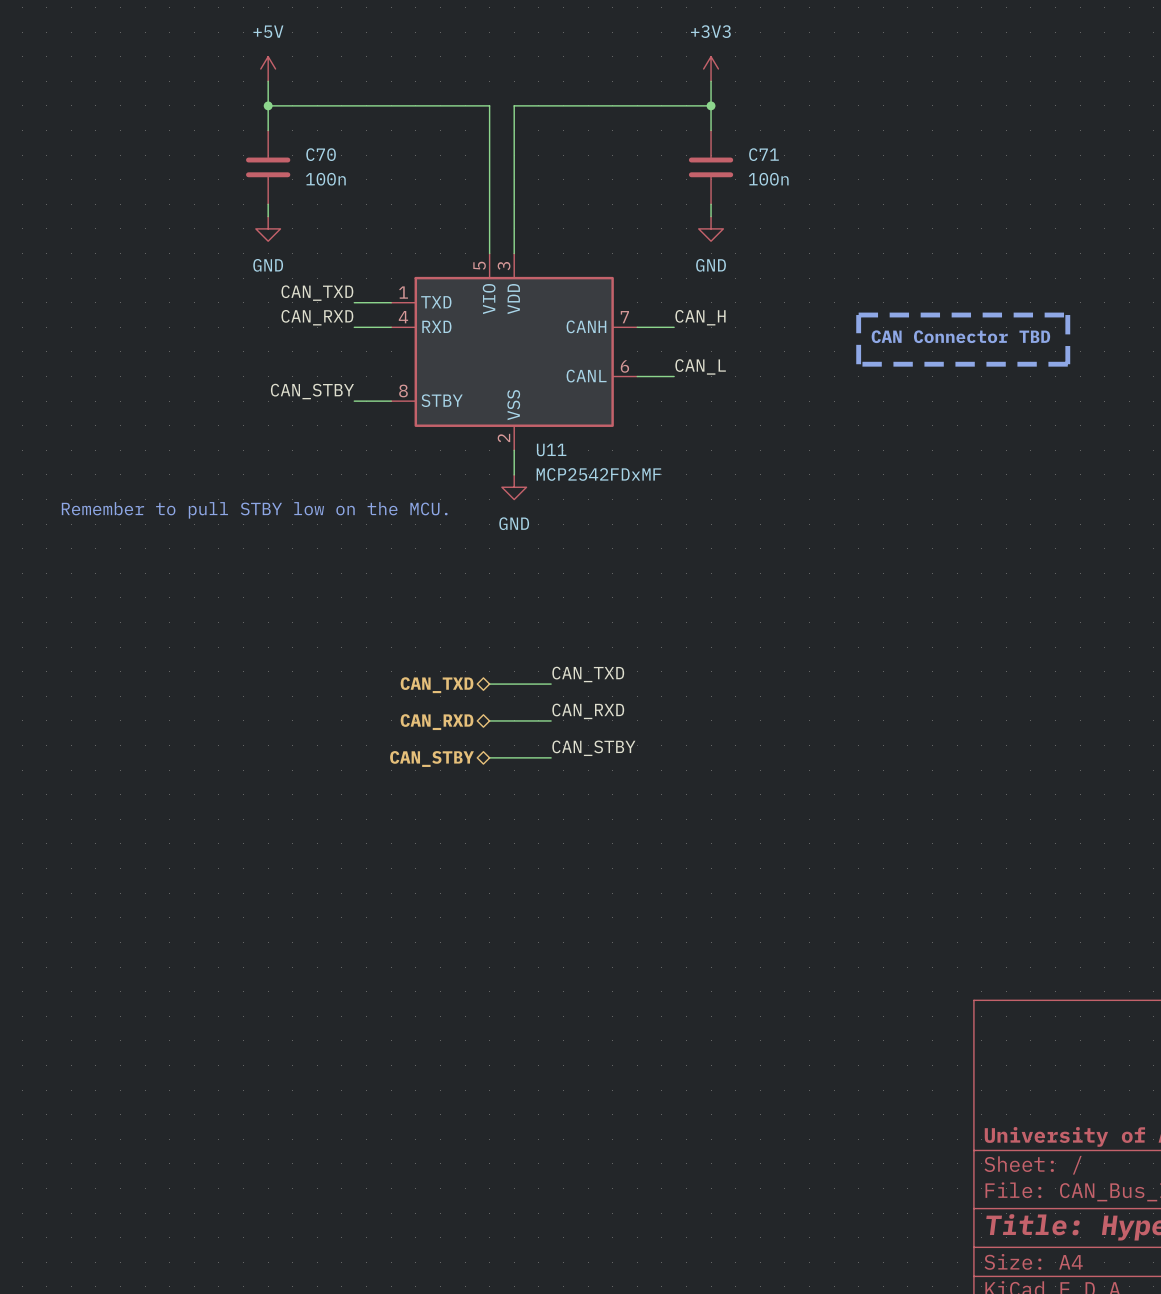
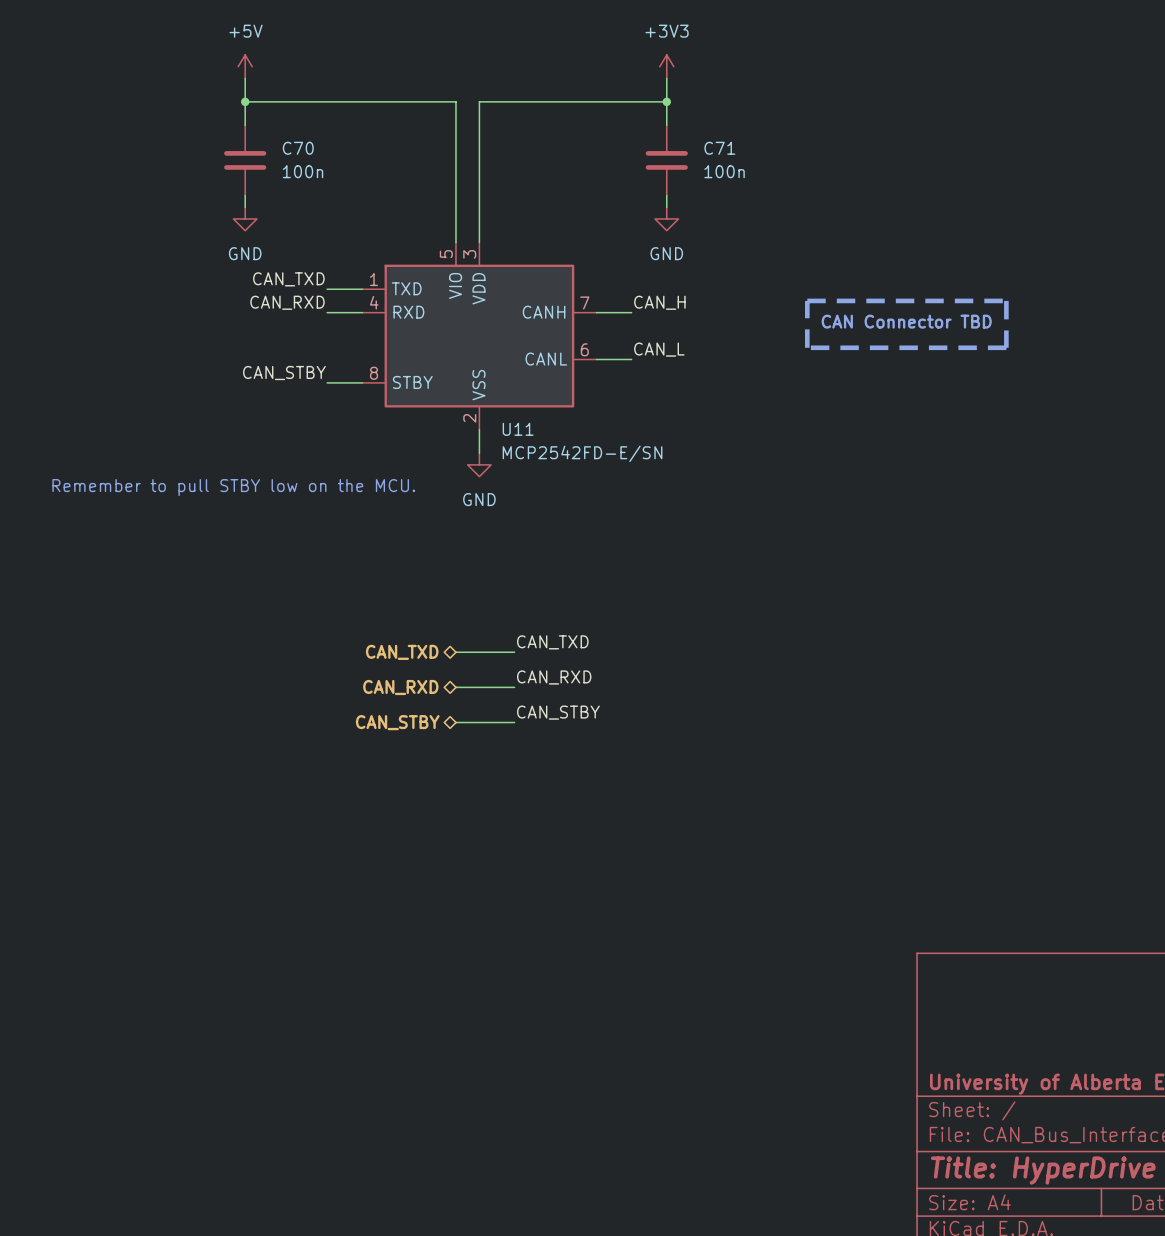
U11 value: MCP2542FDxMF (598, 474) -> MCP2542FD-E/SN (582, 453)

